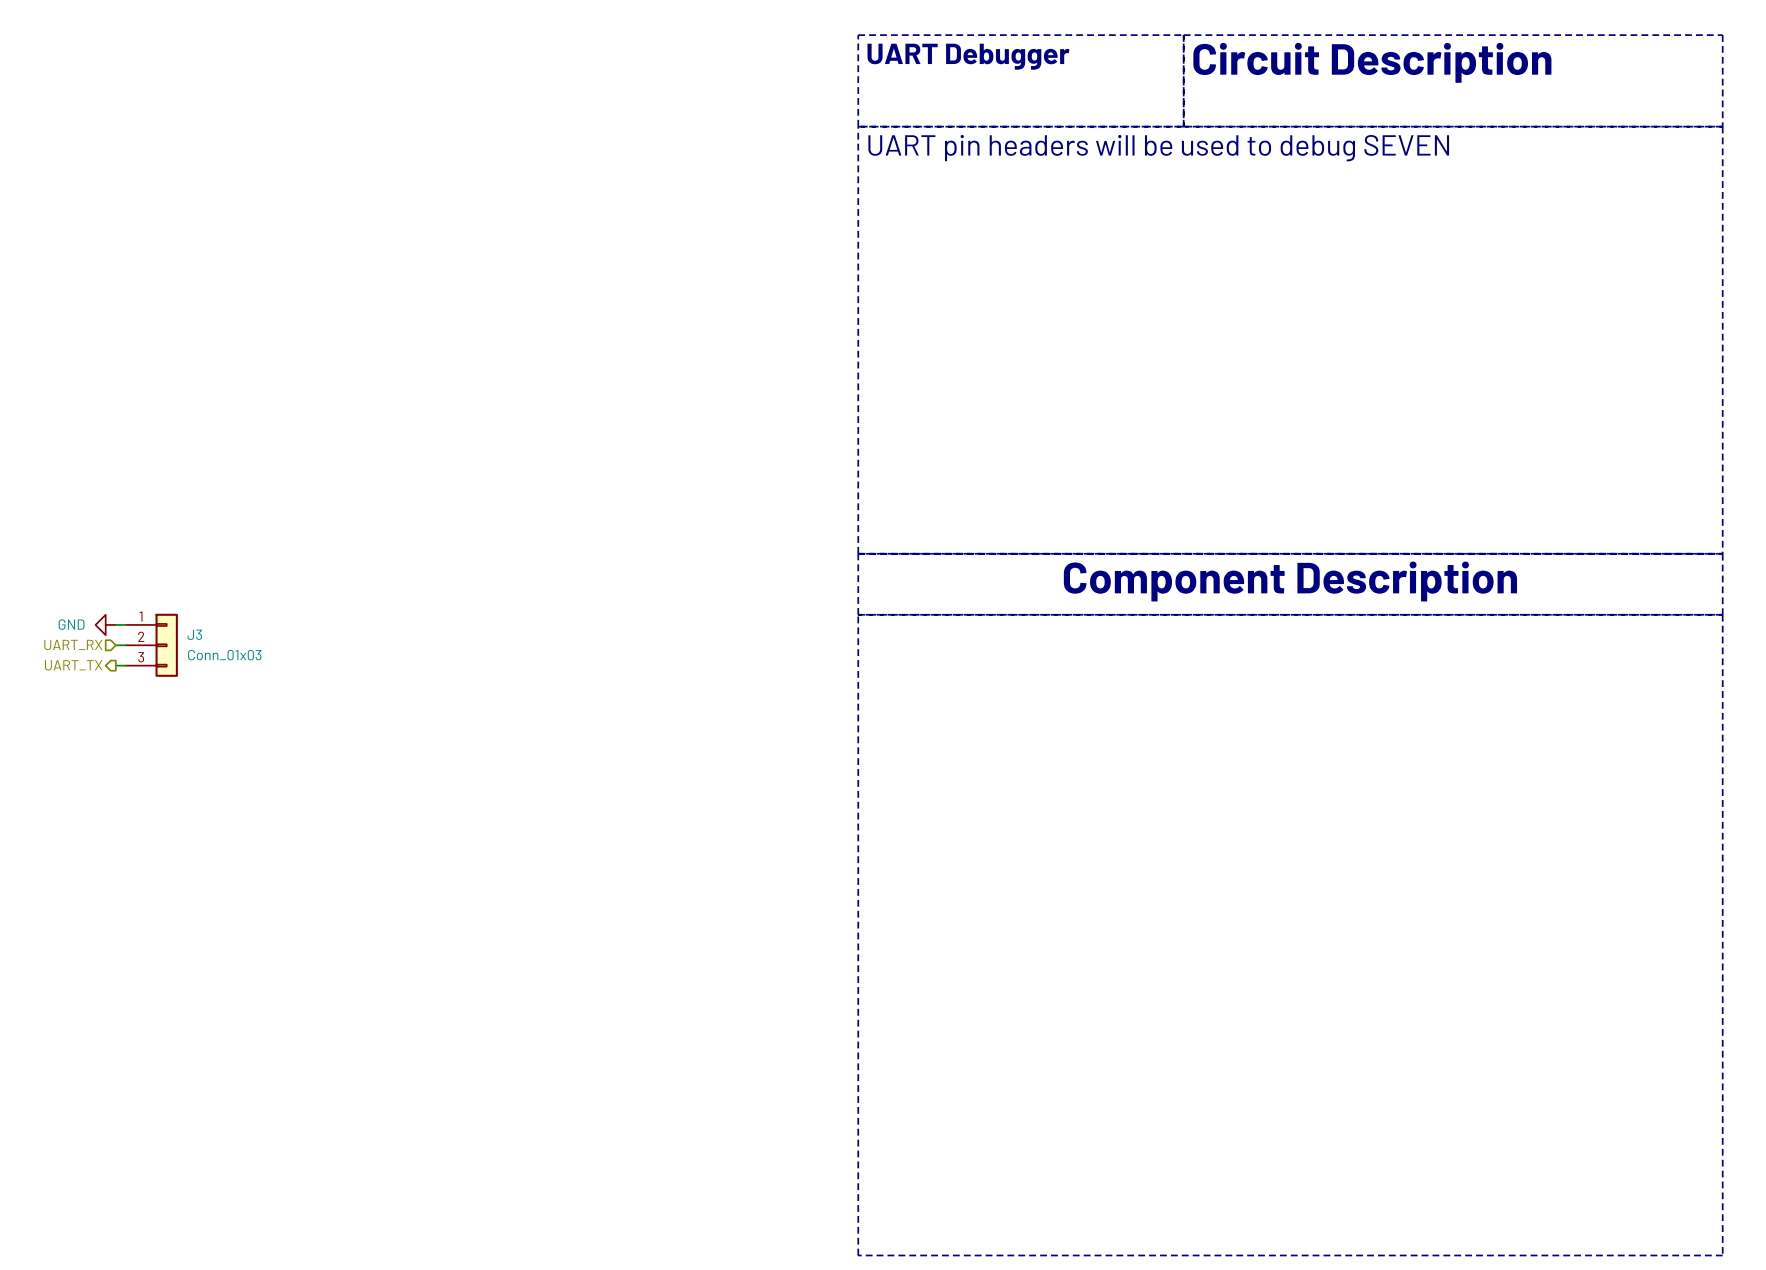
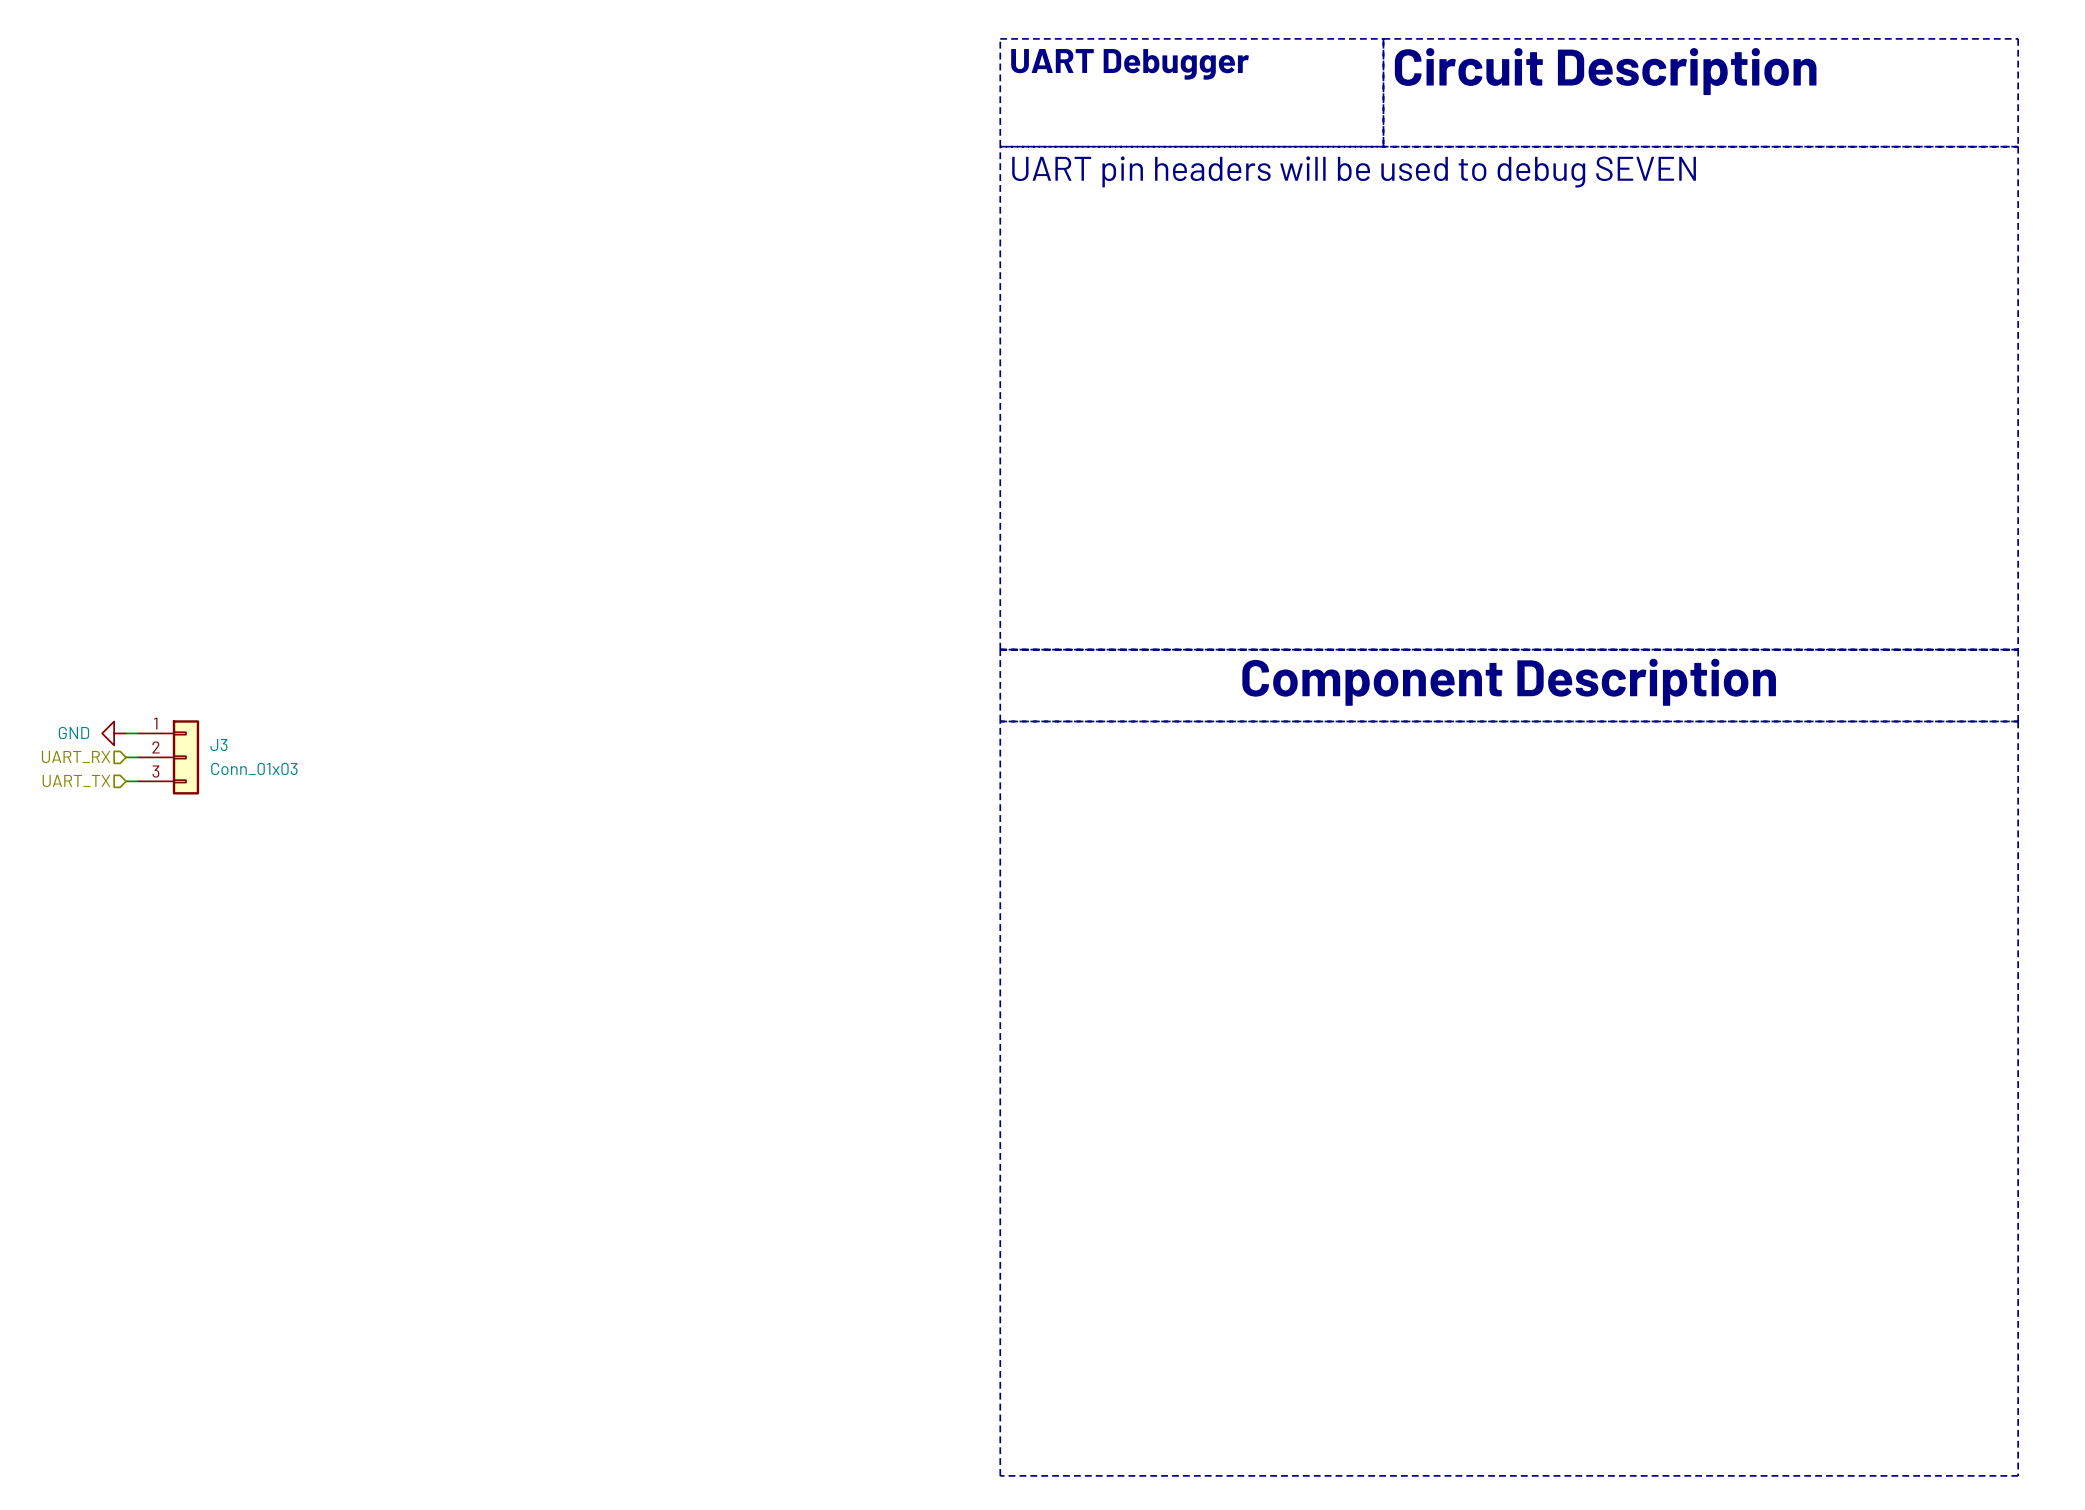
hierarchical label shape: output (73, 665) -> input (76, 780)

